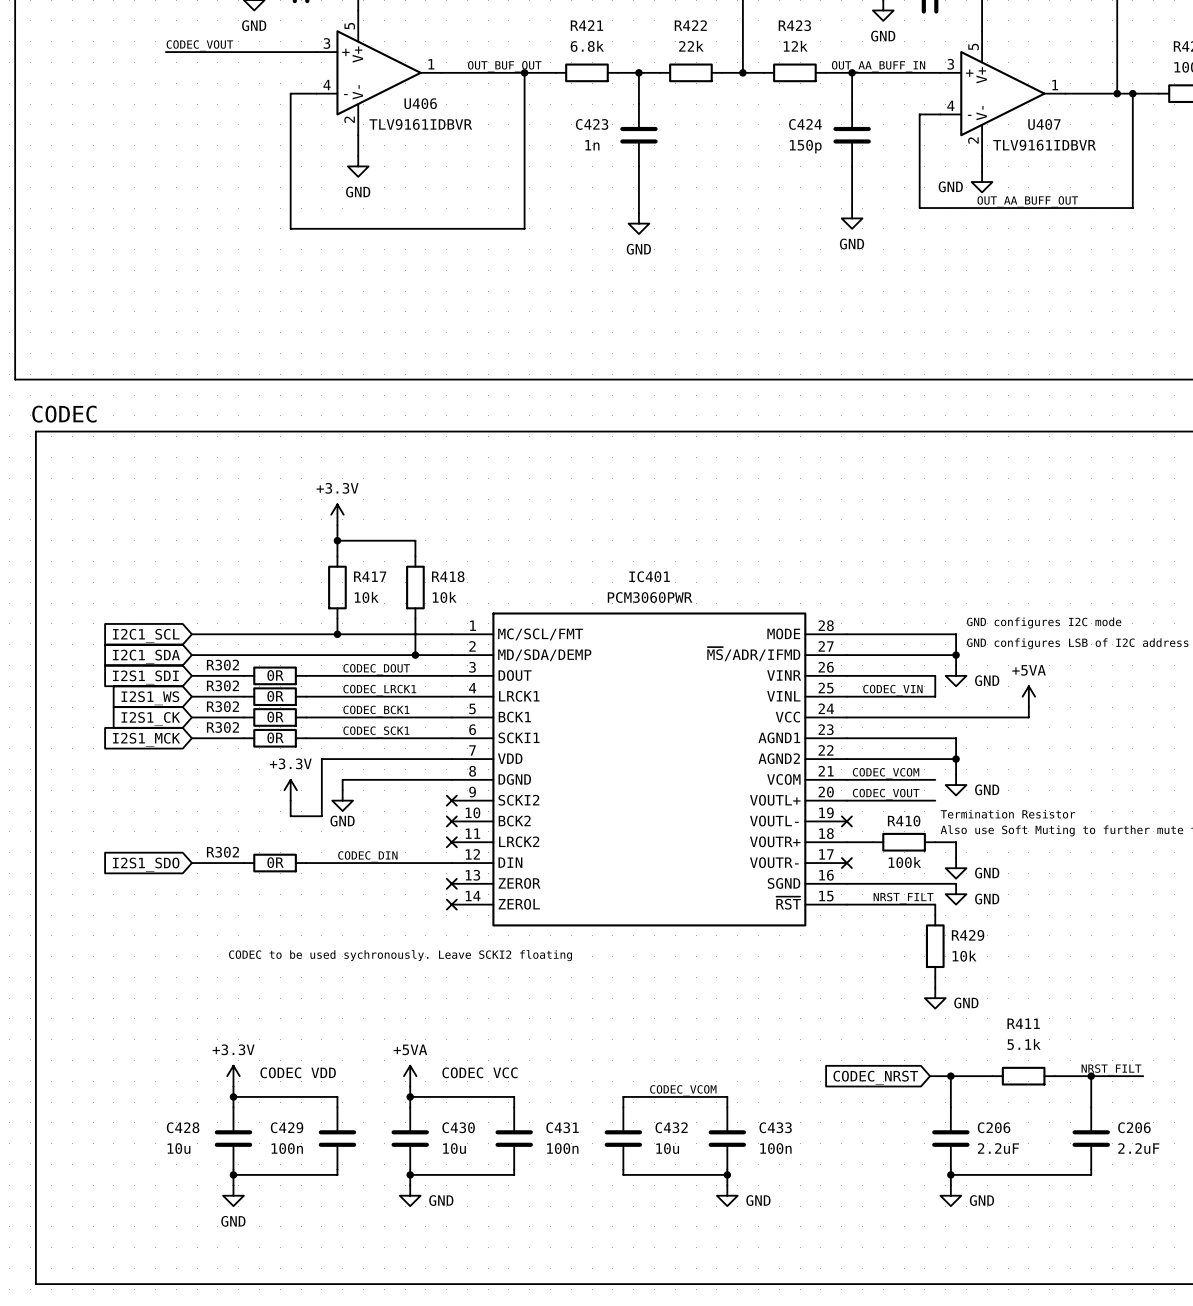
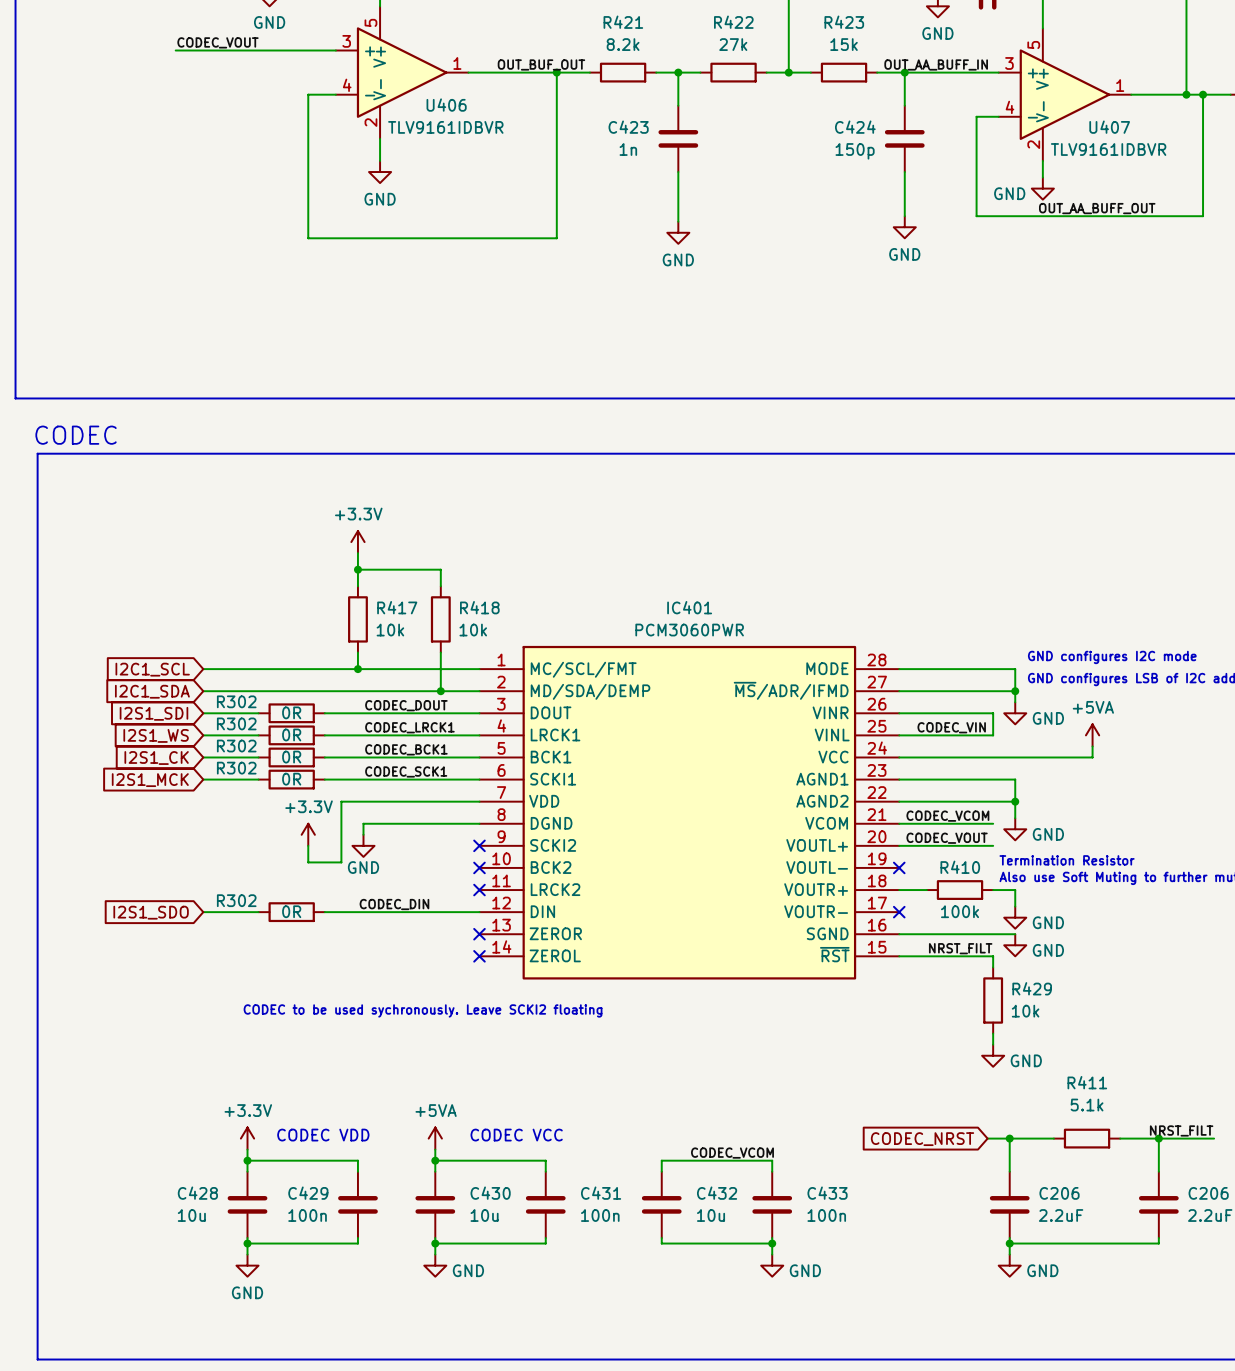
R421 value: 6.8k (587, 46) -> 8.2k (623, 44)
R422 value: 22k (691, 46) -> 27k (733, 44)
R423 value: 12k (795, 46) -> 15k (844, 44)

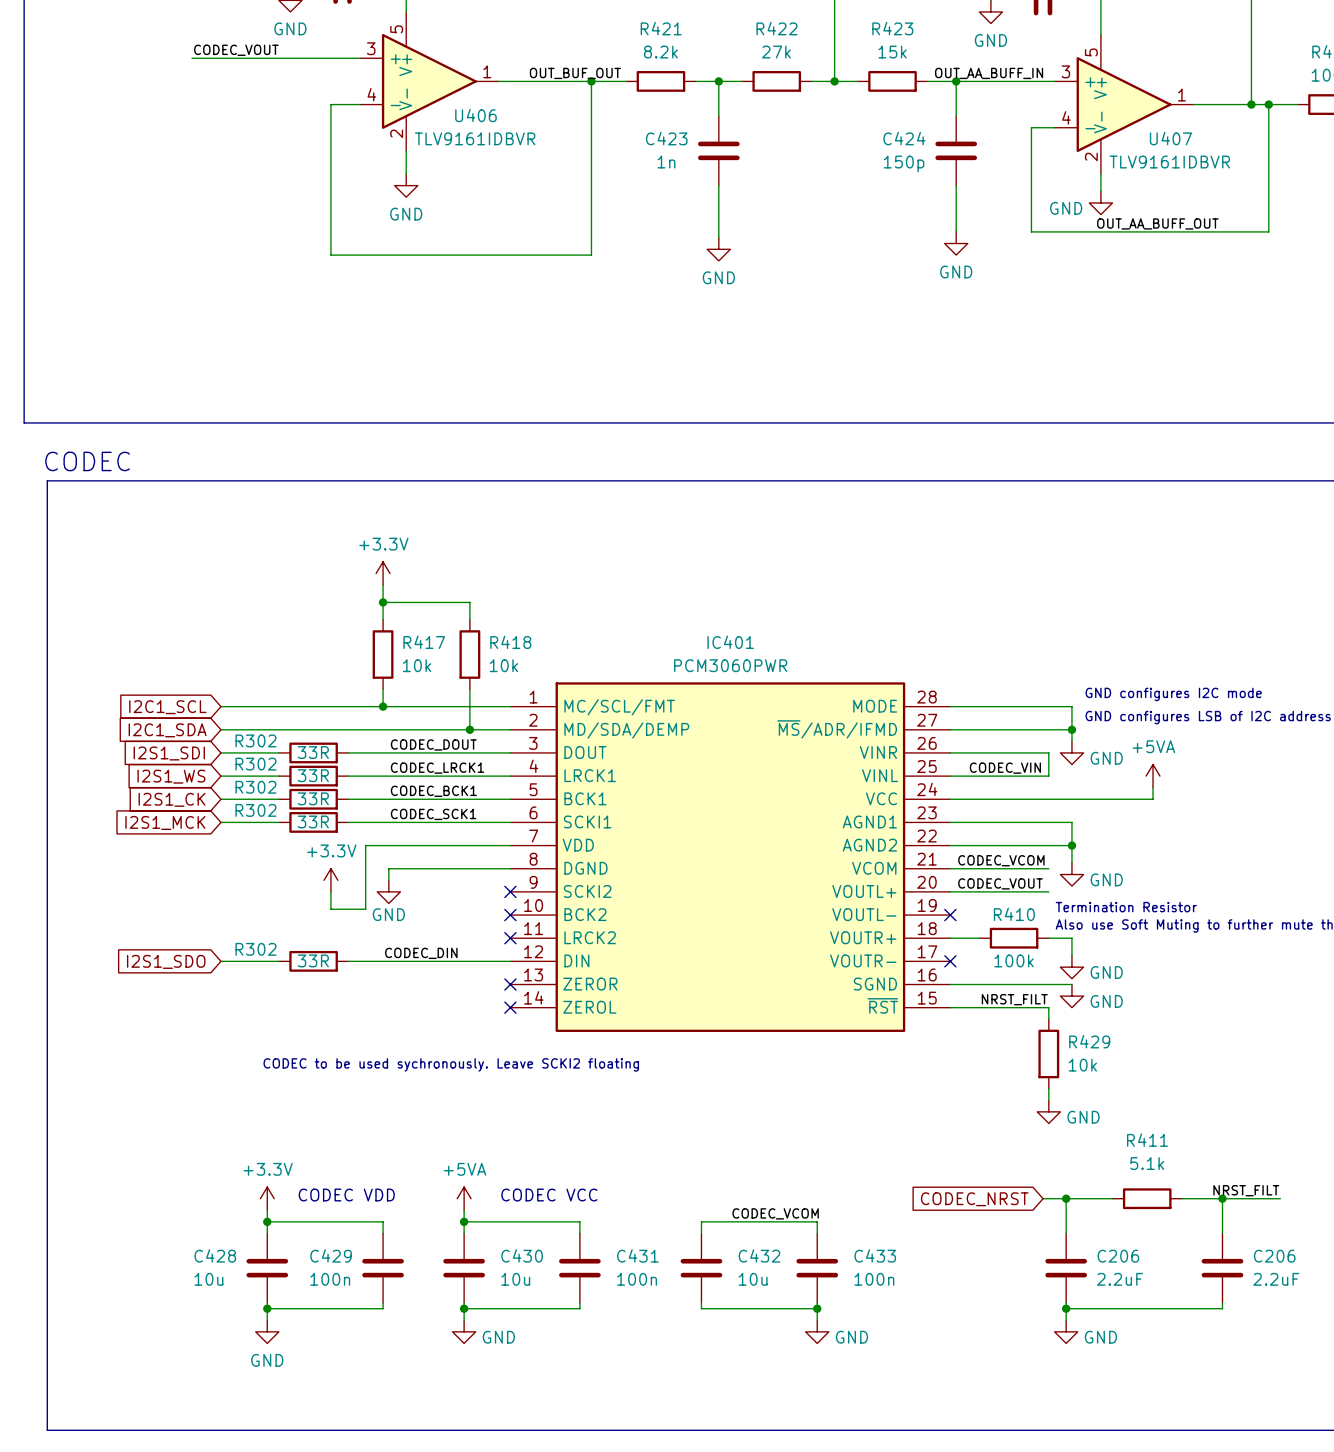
R302 value: 0R (291, 712) -> 33R (313, 752)
R302 value: 0R (291, 734) -> 33R (313, 775)
R302 value: 0R (291, 757) -> 33R (313, 798)
R302 value: 0R (291, 779) -> 33R (313, 821)
R302 value: 0R (291, 911) -> 33R (313, 960)

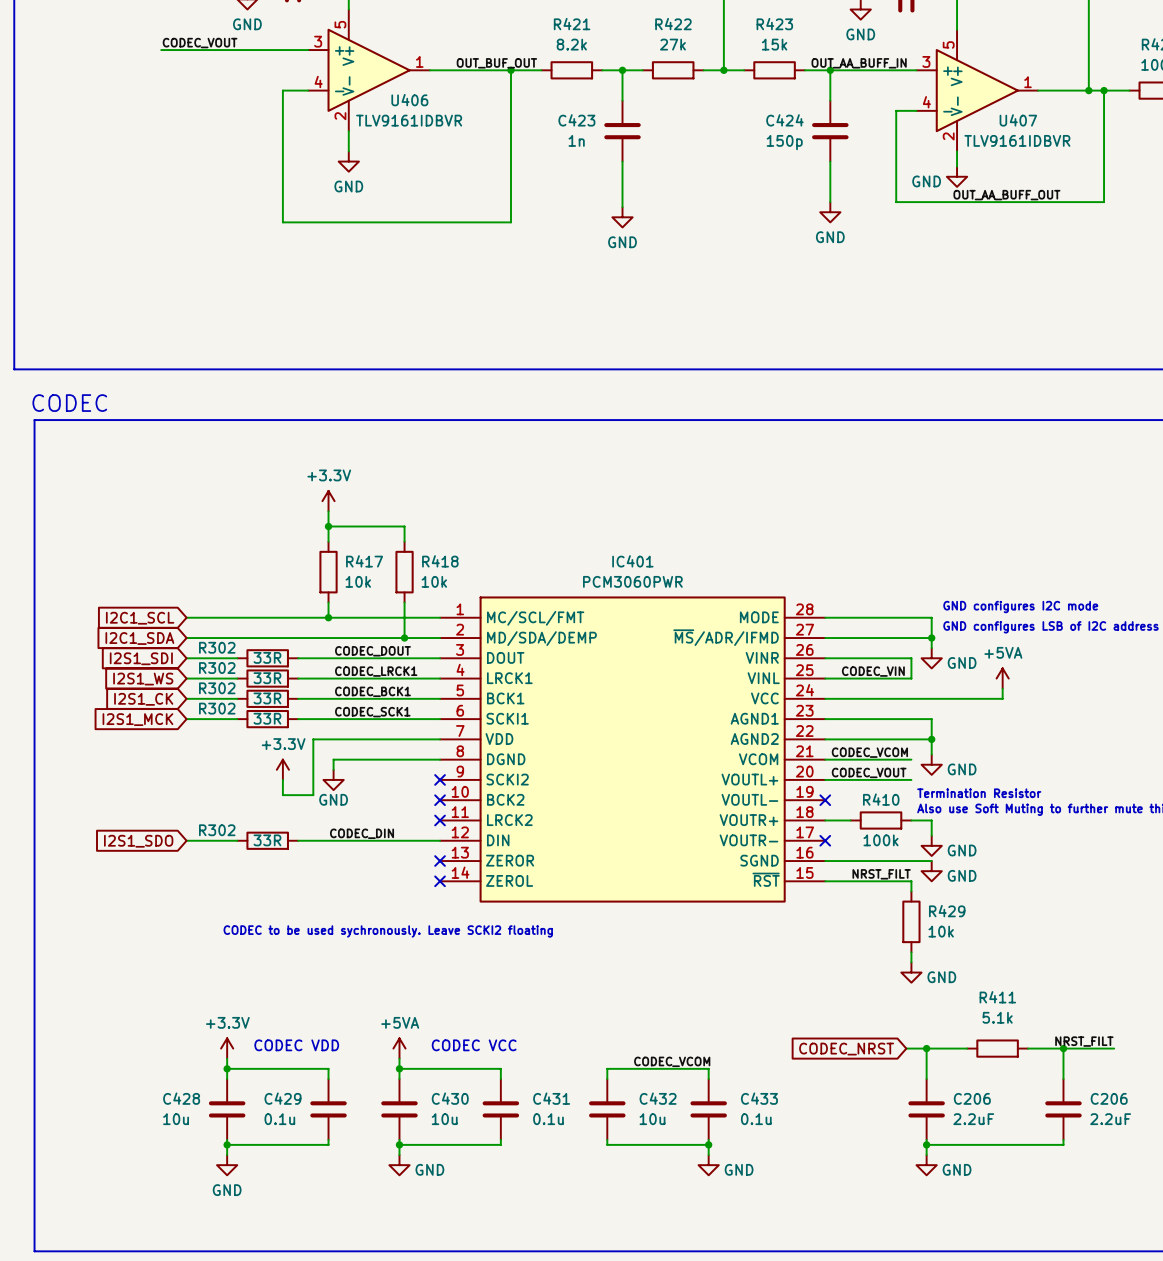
C429 value: 100n (330, 1279) -> 0.1u (279, 1119)
C431 value: 100n (637, 1279) -> 0.1u (548, 1119)
C433 value: 100n (874, 1279) -> 0.1u (756, 1119)

